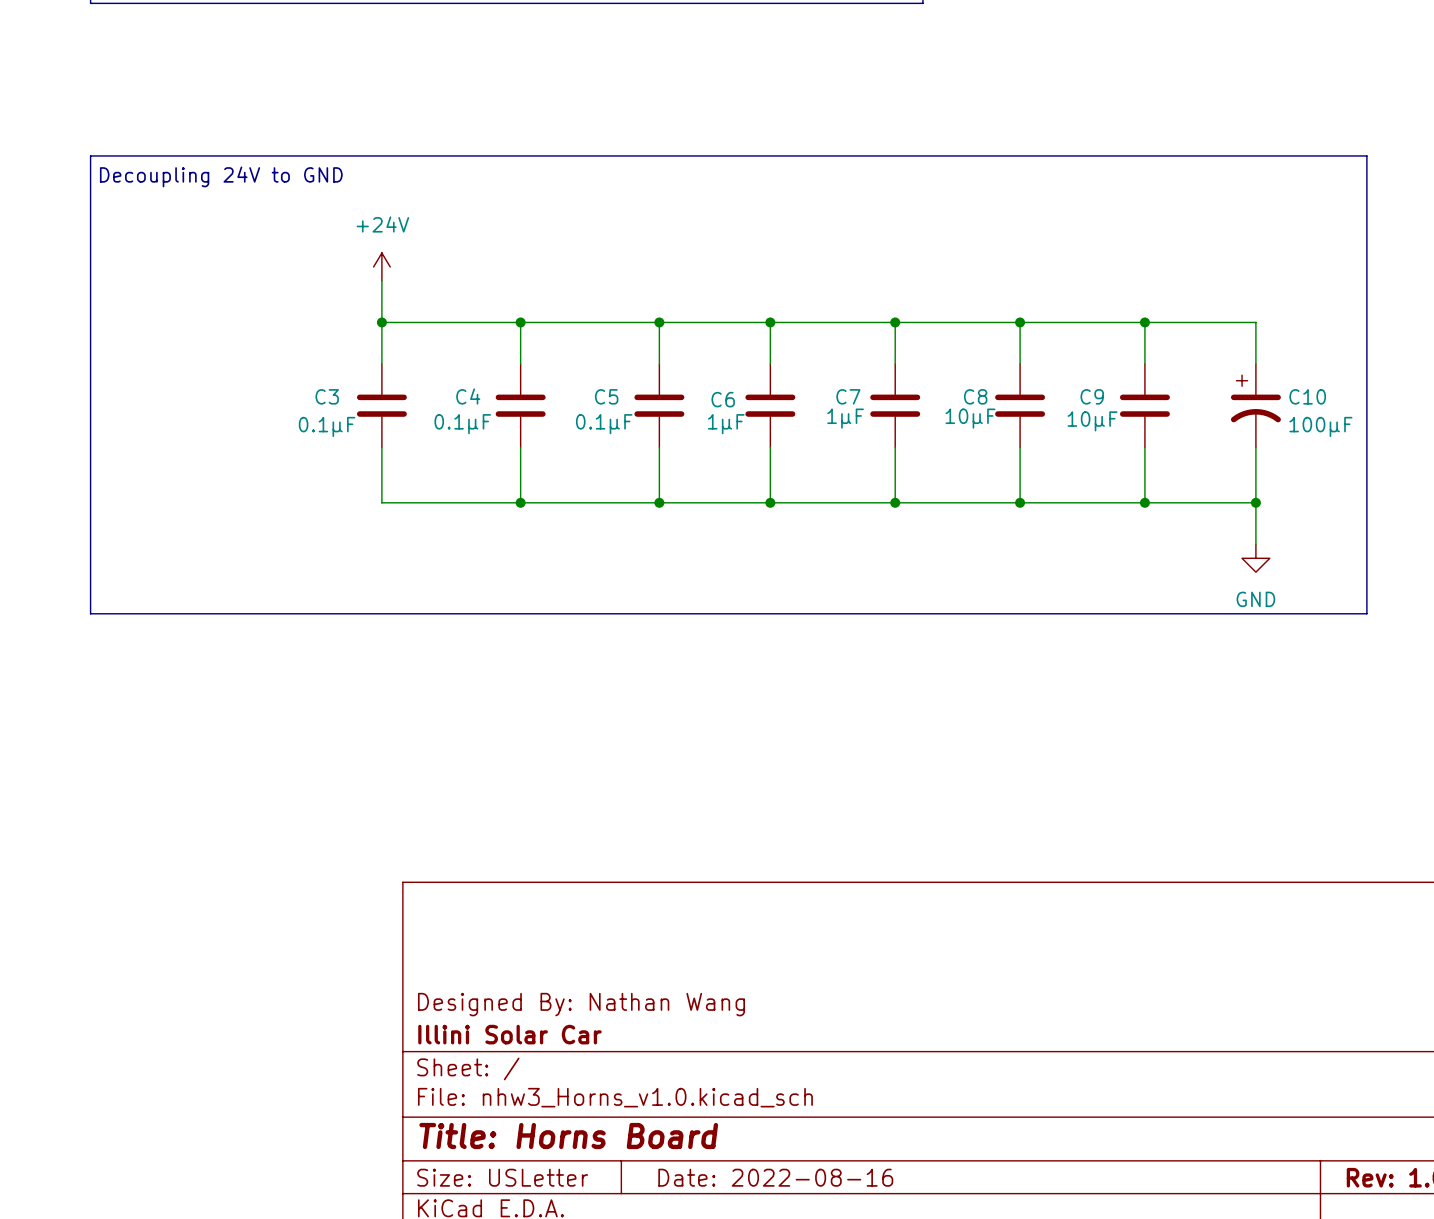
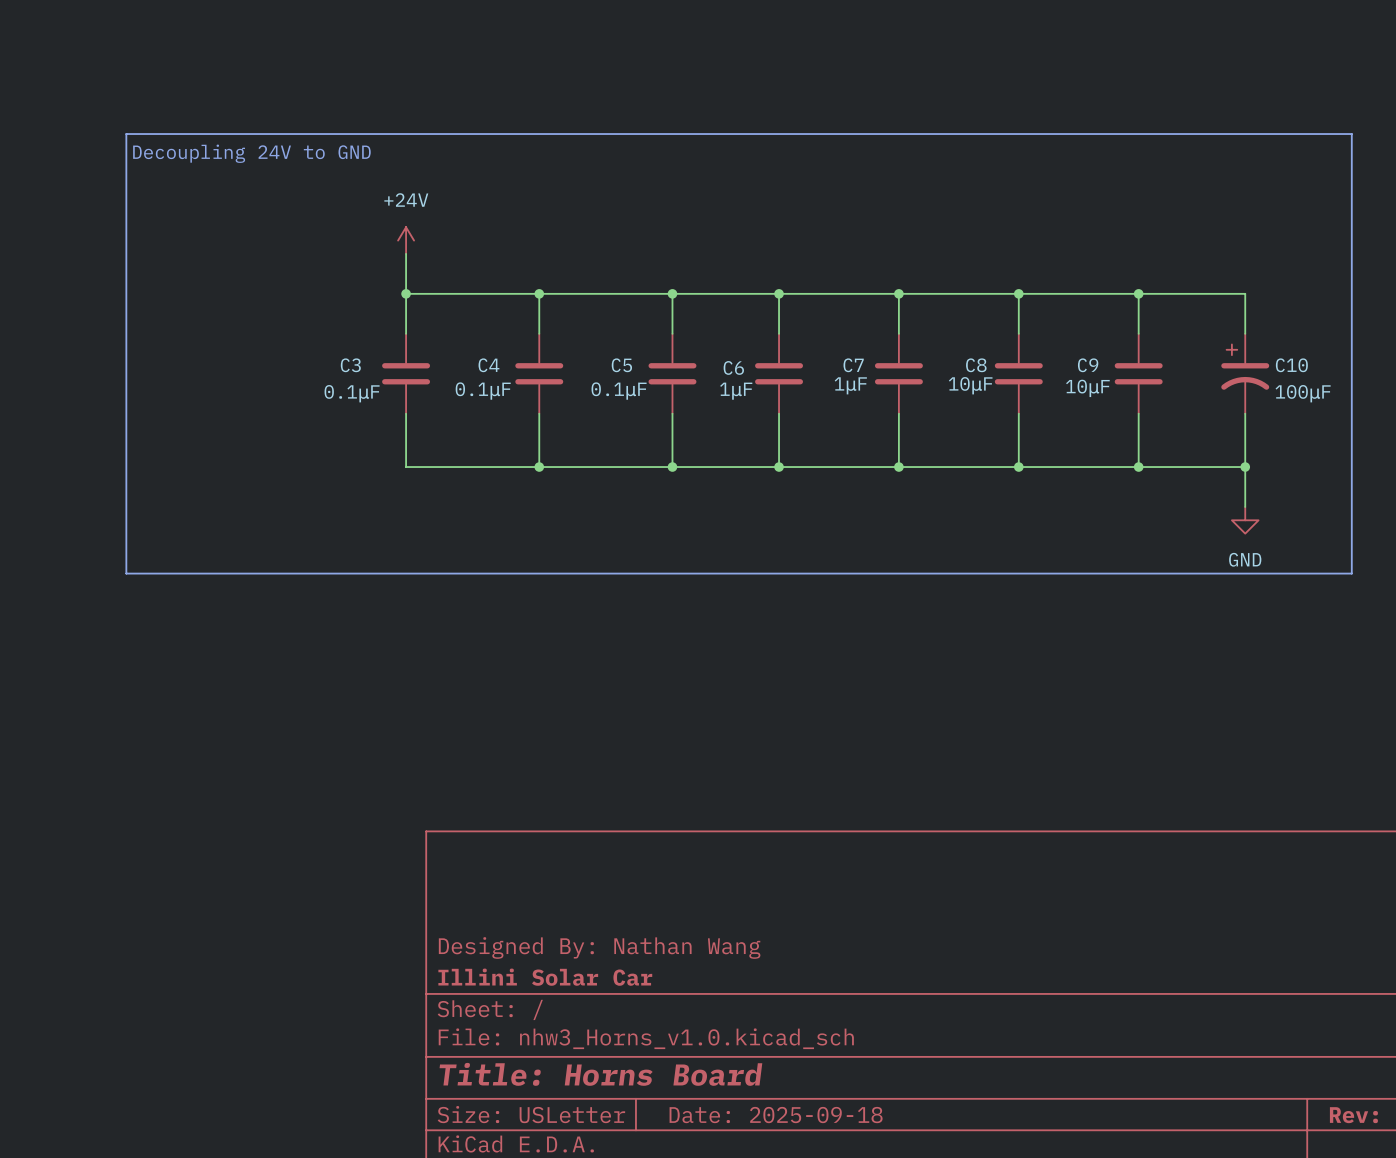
title block: Date: 2022-08-16 (775, 1177) -> Date: 2025-09-18 (776, 1115)

